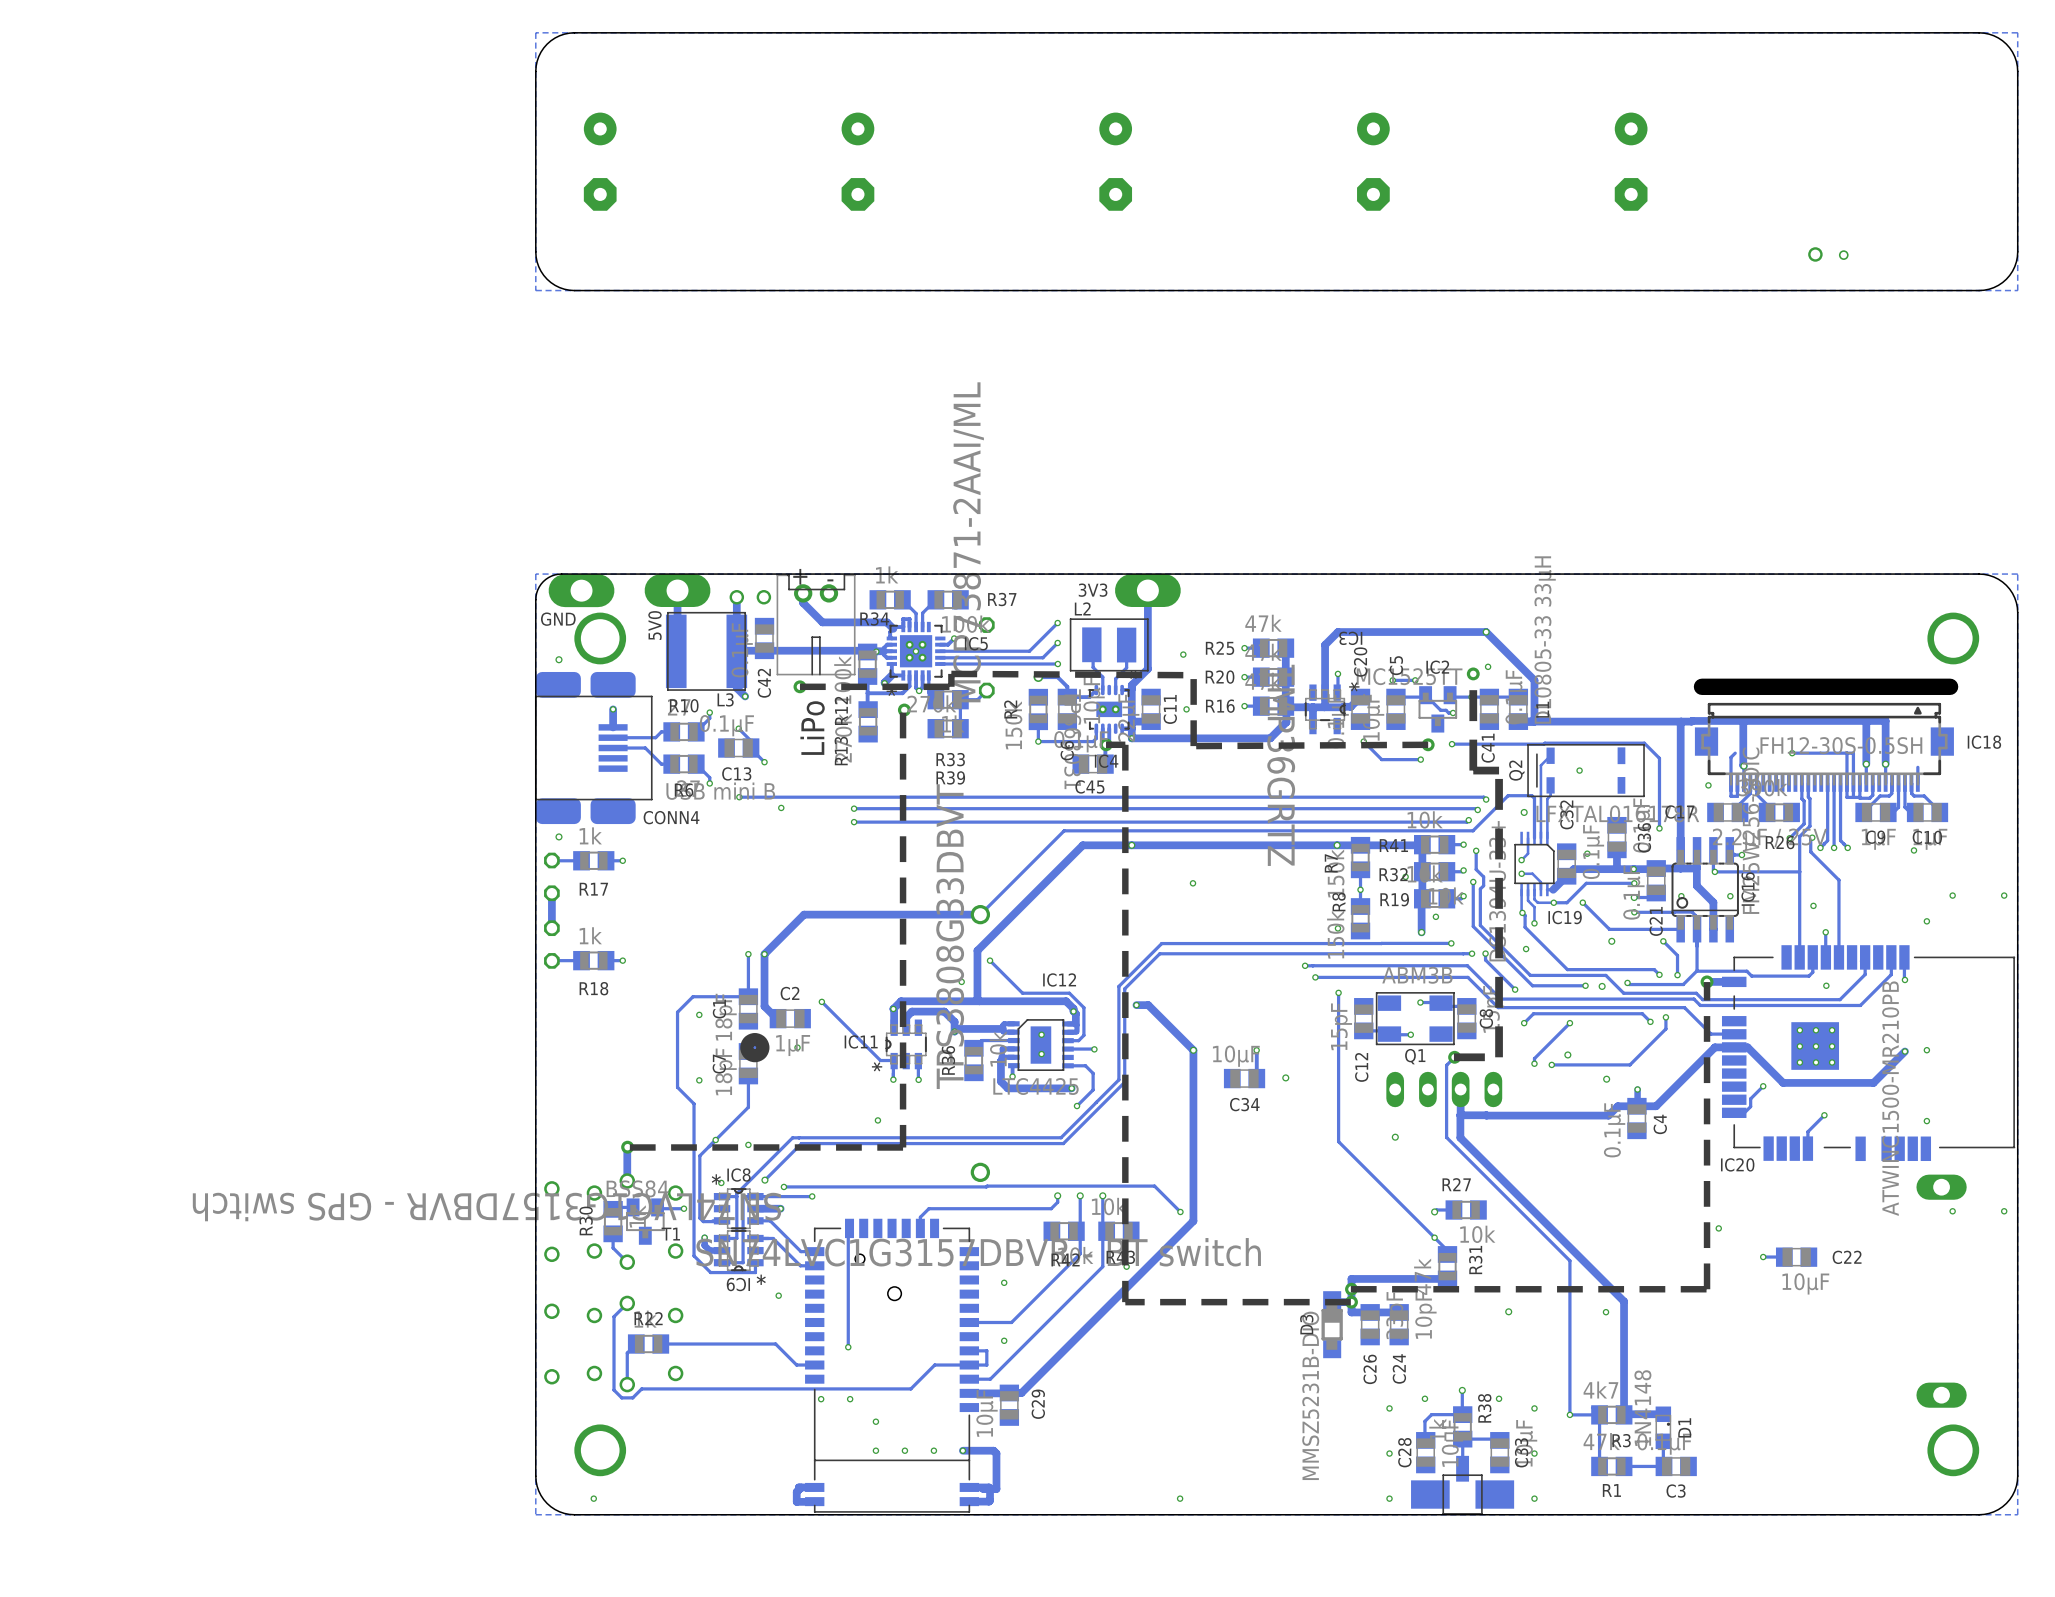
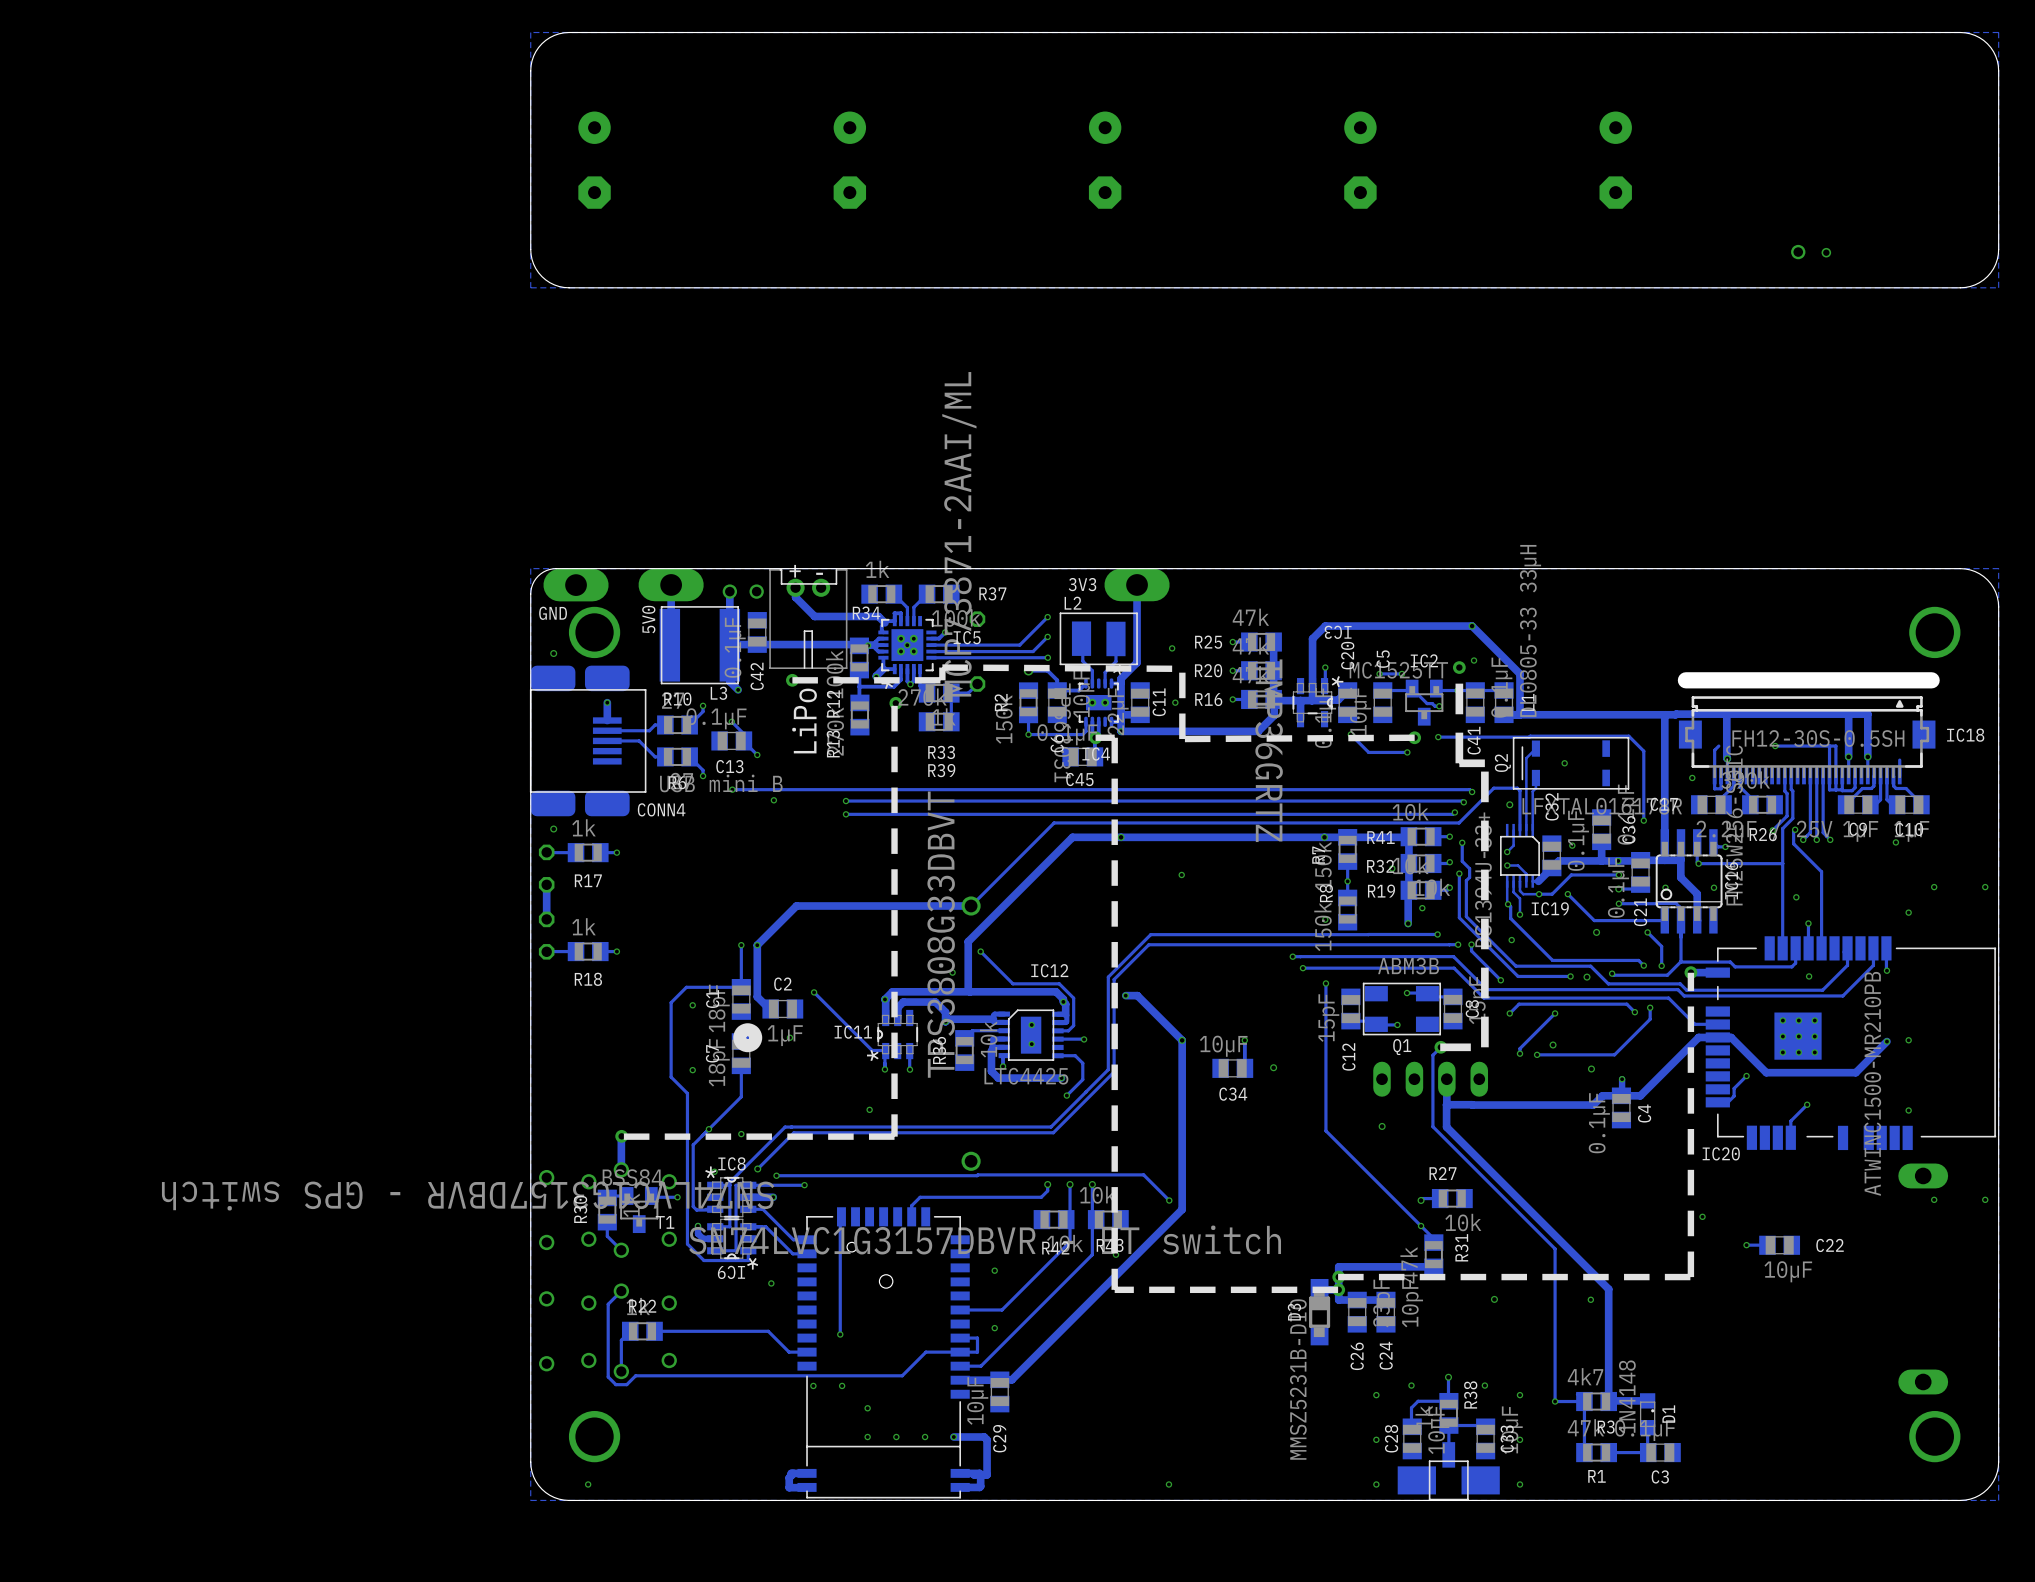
C29 name position: C29 (1038, 1404) -> C29 (999, 1438)

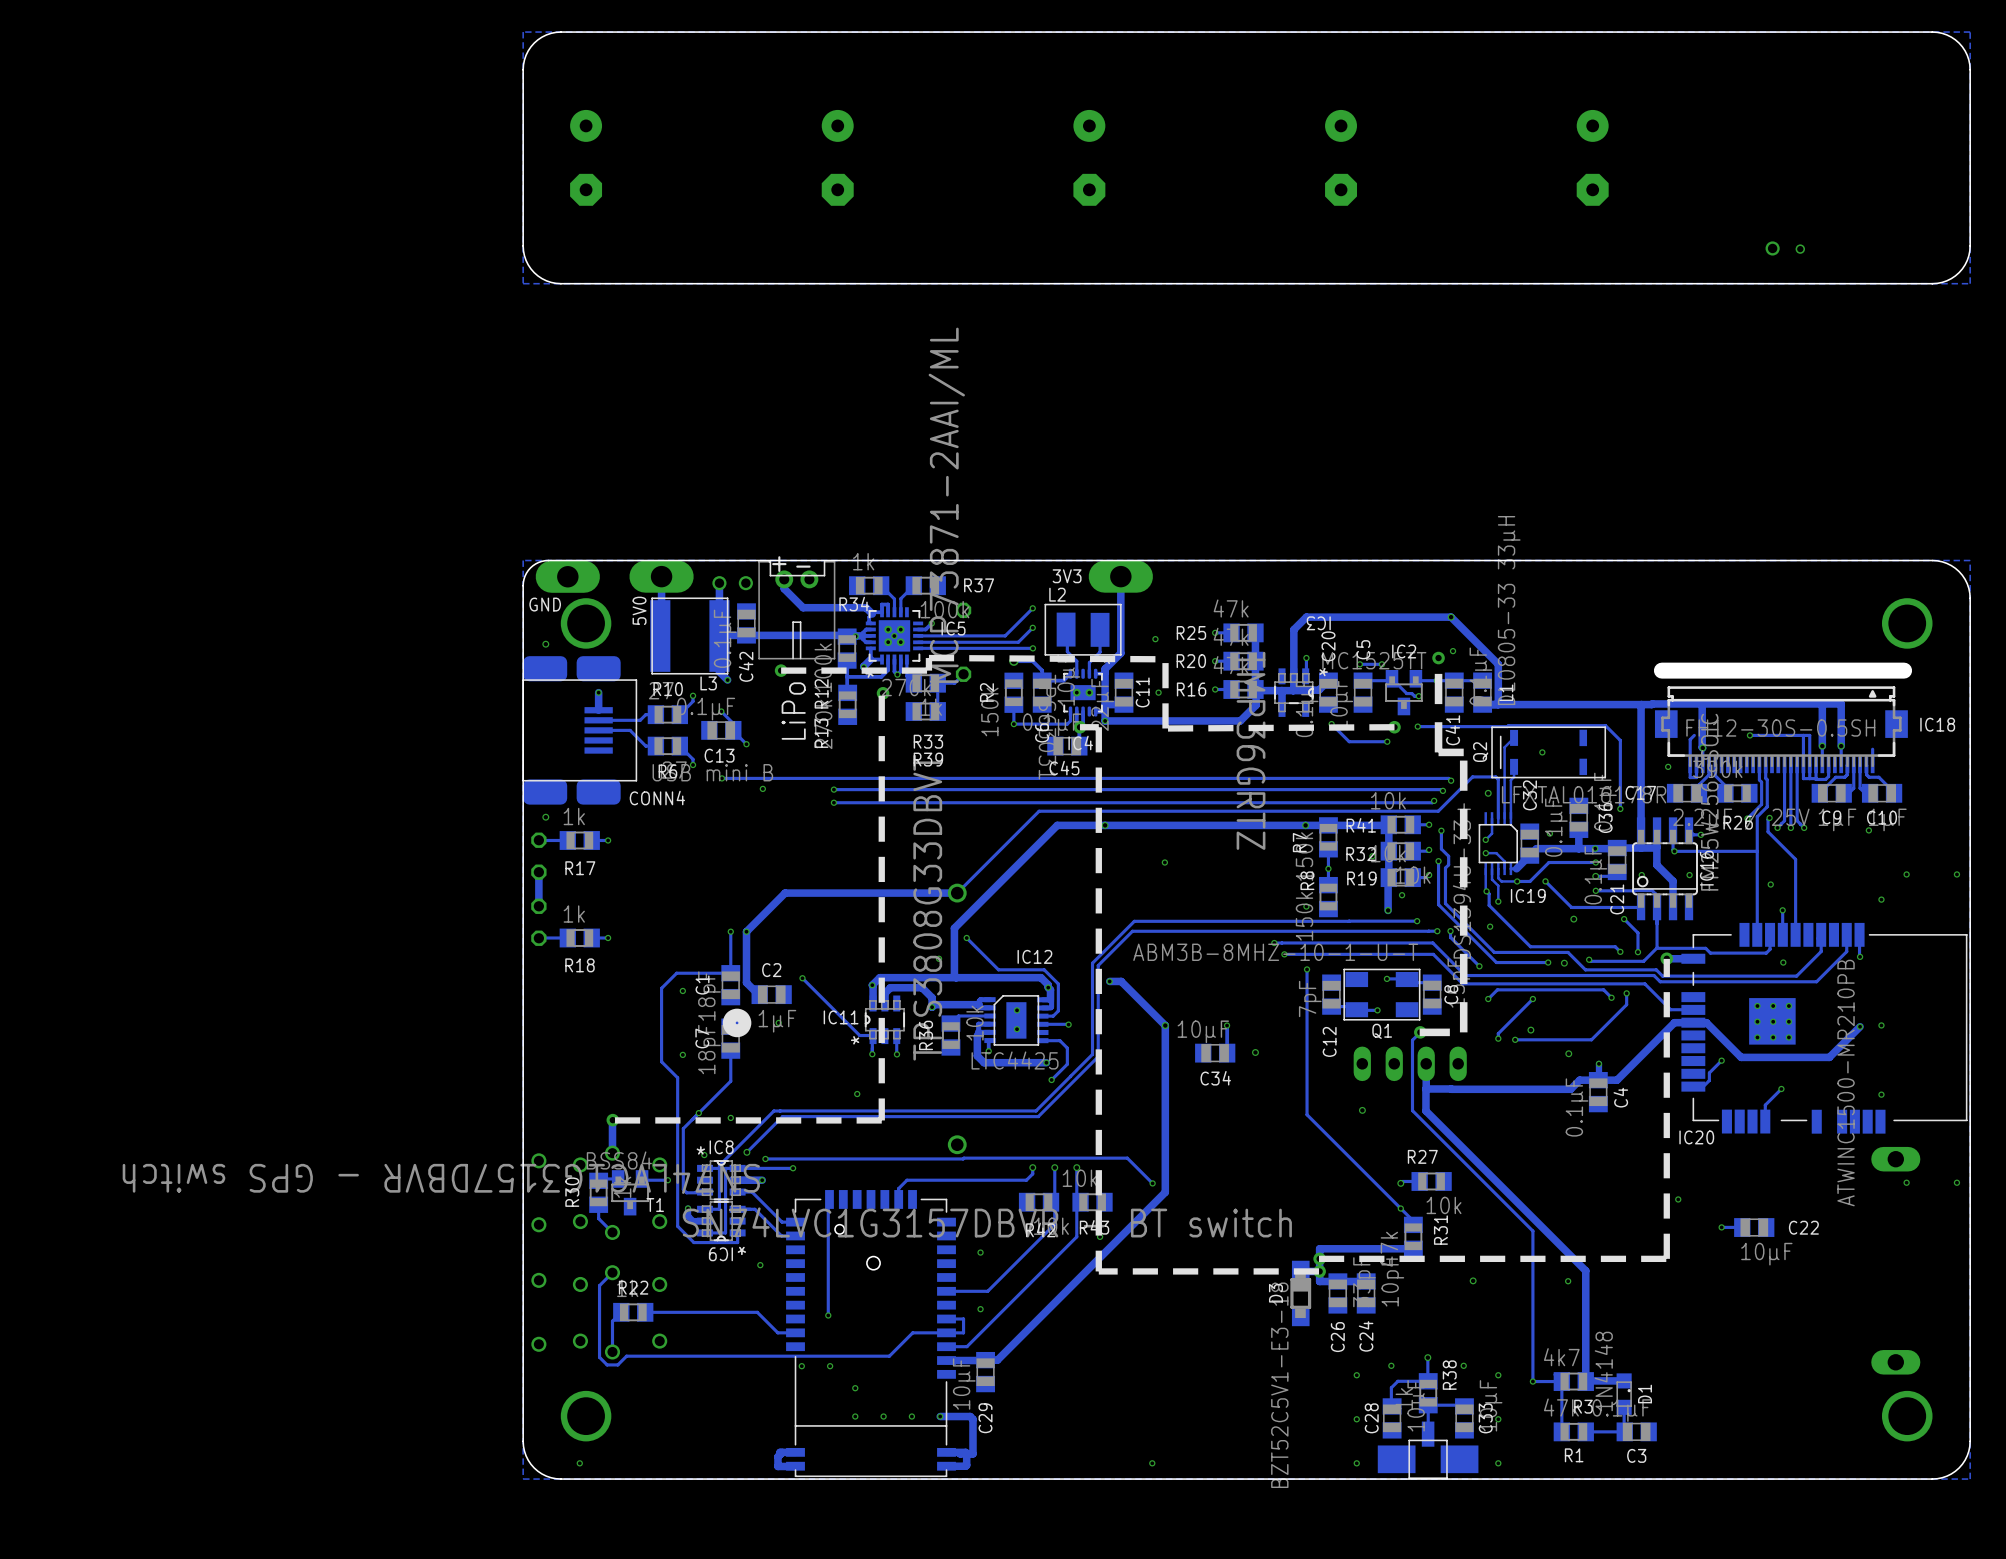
Q1 value: ABM3B (1408, 966) -> ABM3B-8MHZ-10-1-U-T (1275, 952)
C12 value: 15pF (1328, 1018) -> 7pF (1310, 999)
D3 value: MMSZ5231B-DIO (1298, 1379) -> BZT52C5V1-E3-18 (1279, 1385)

